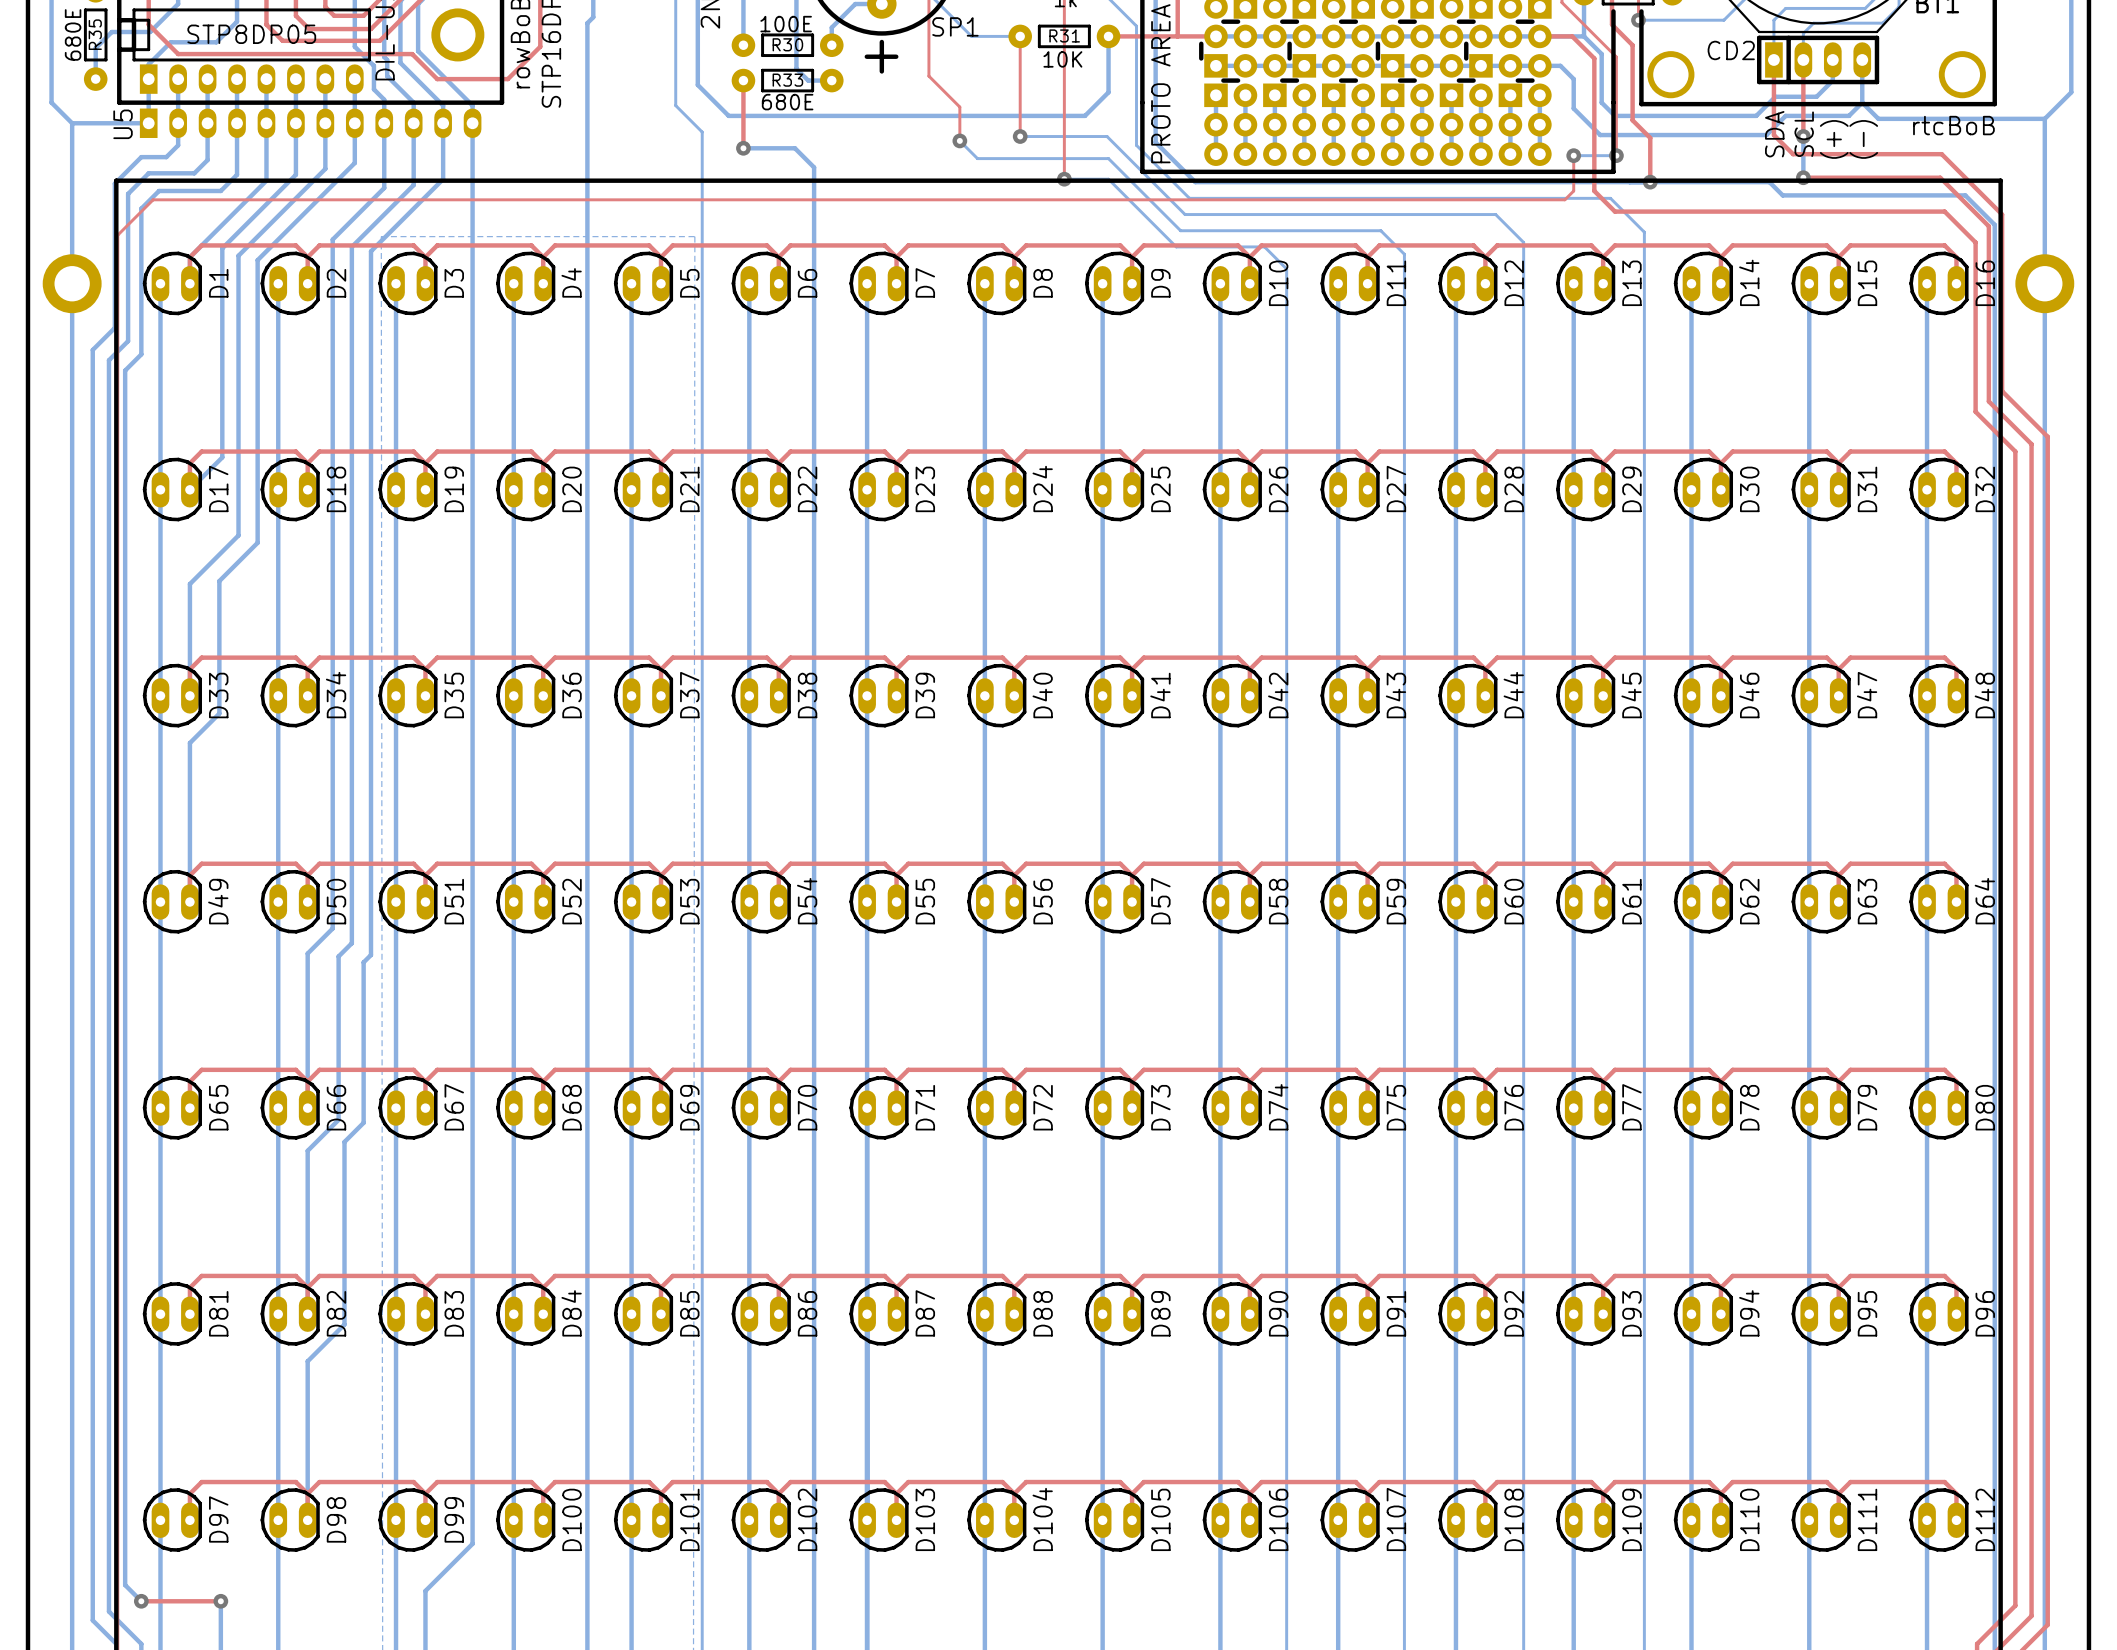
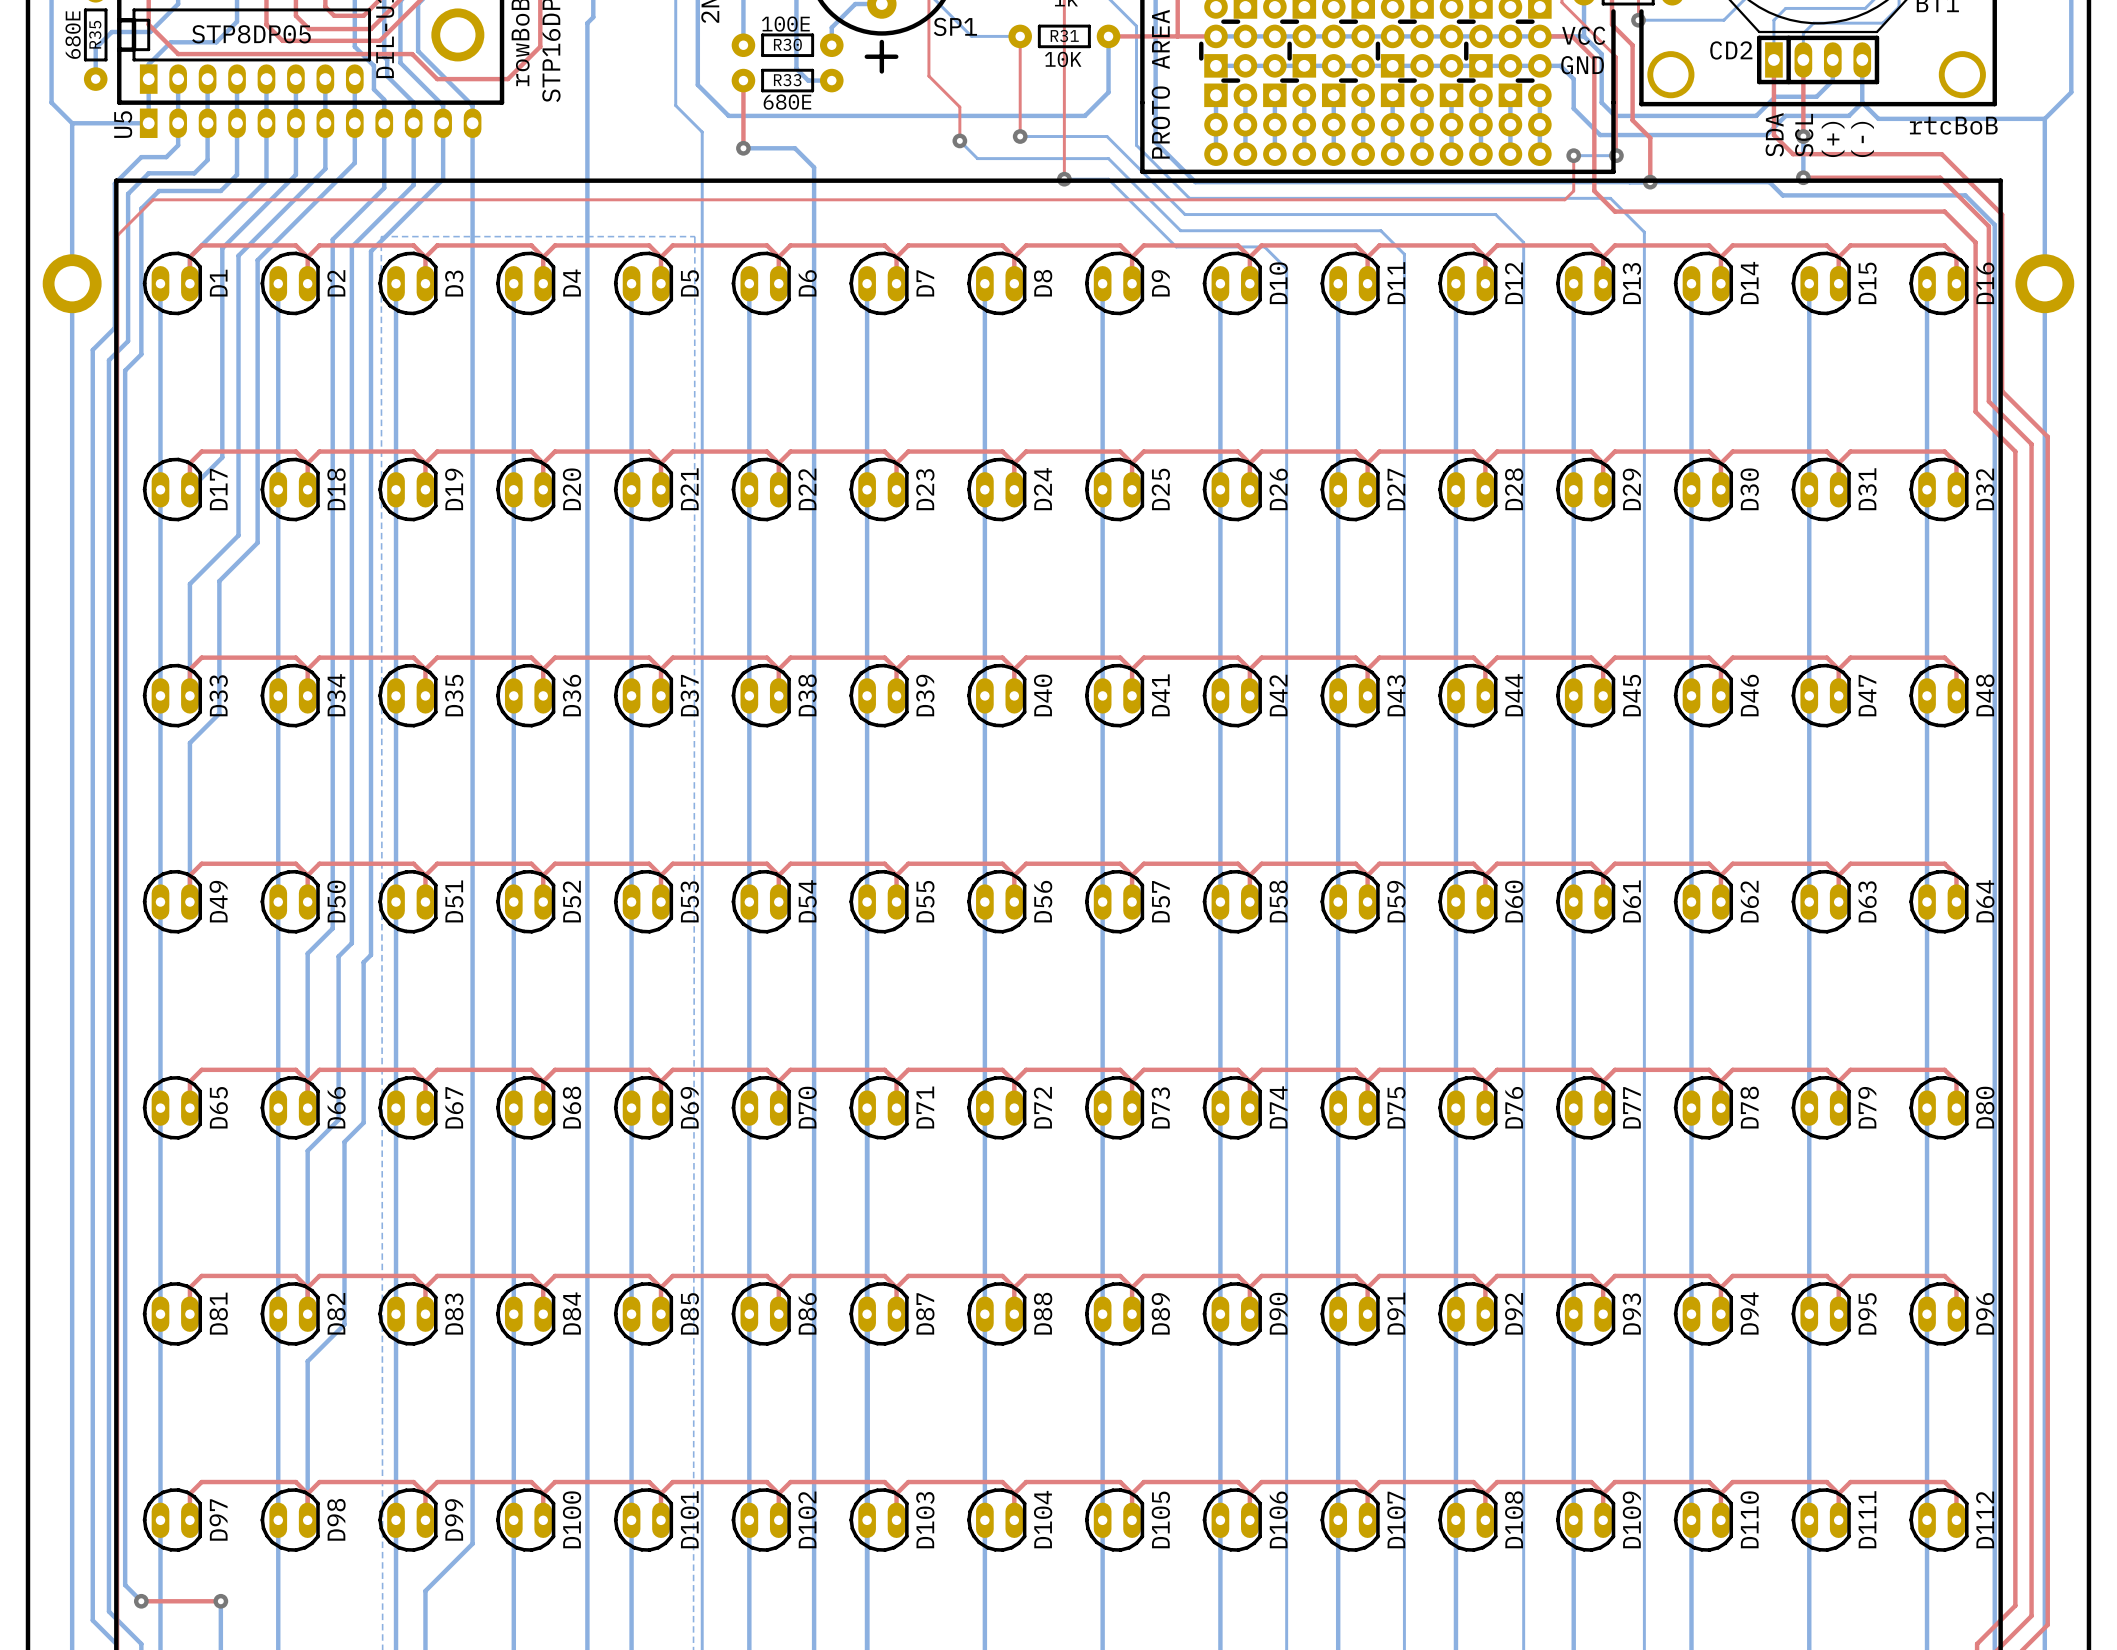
text: none -> VCC (1583, 35)
text: none -> GND (1582, 65)

